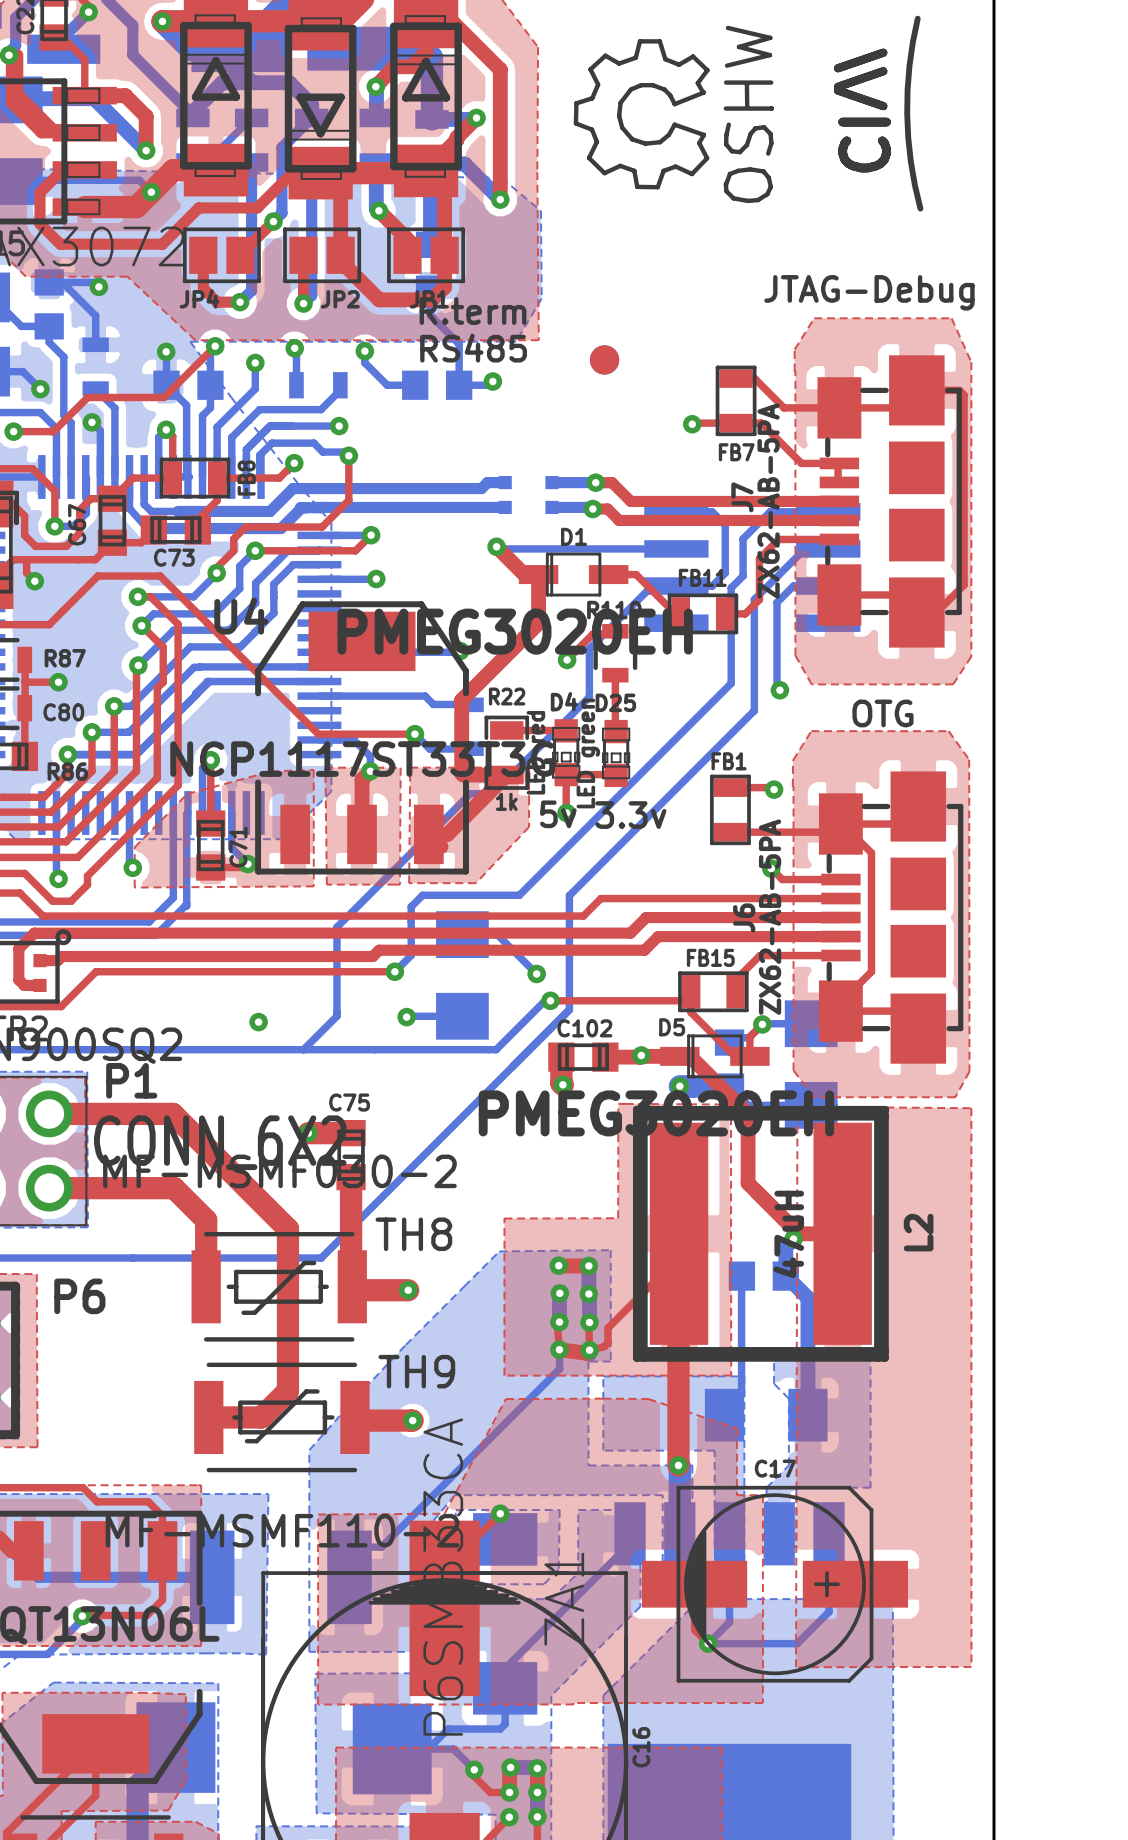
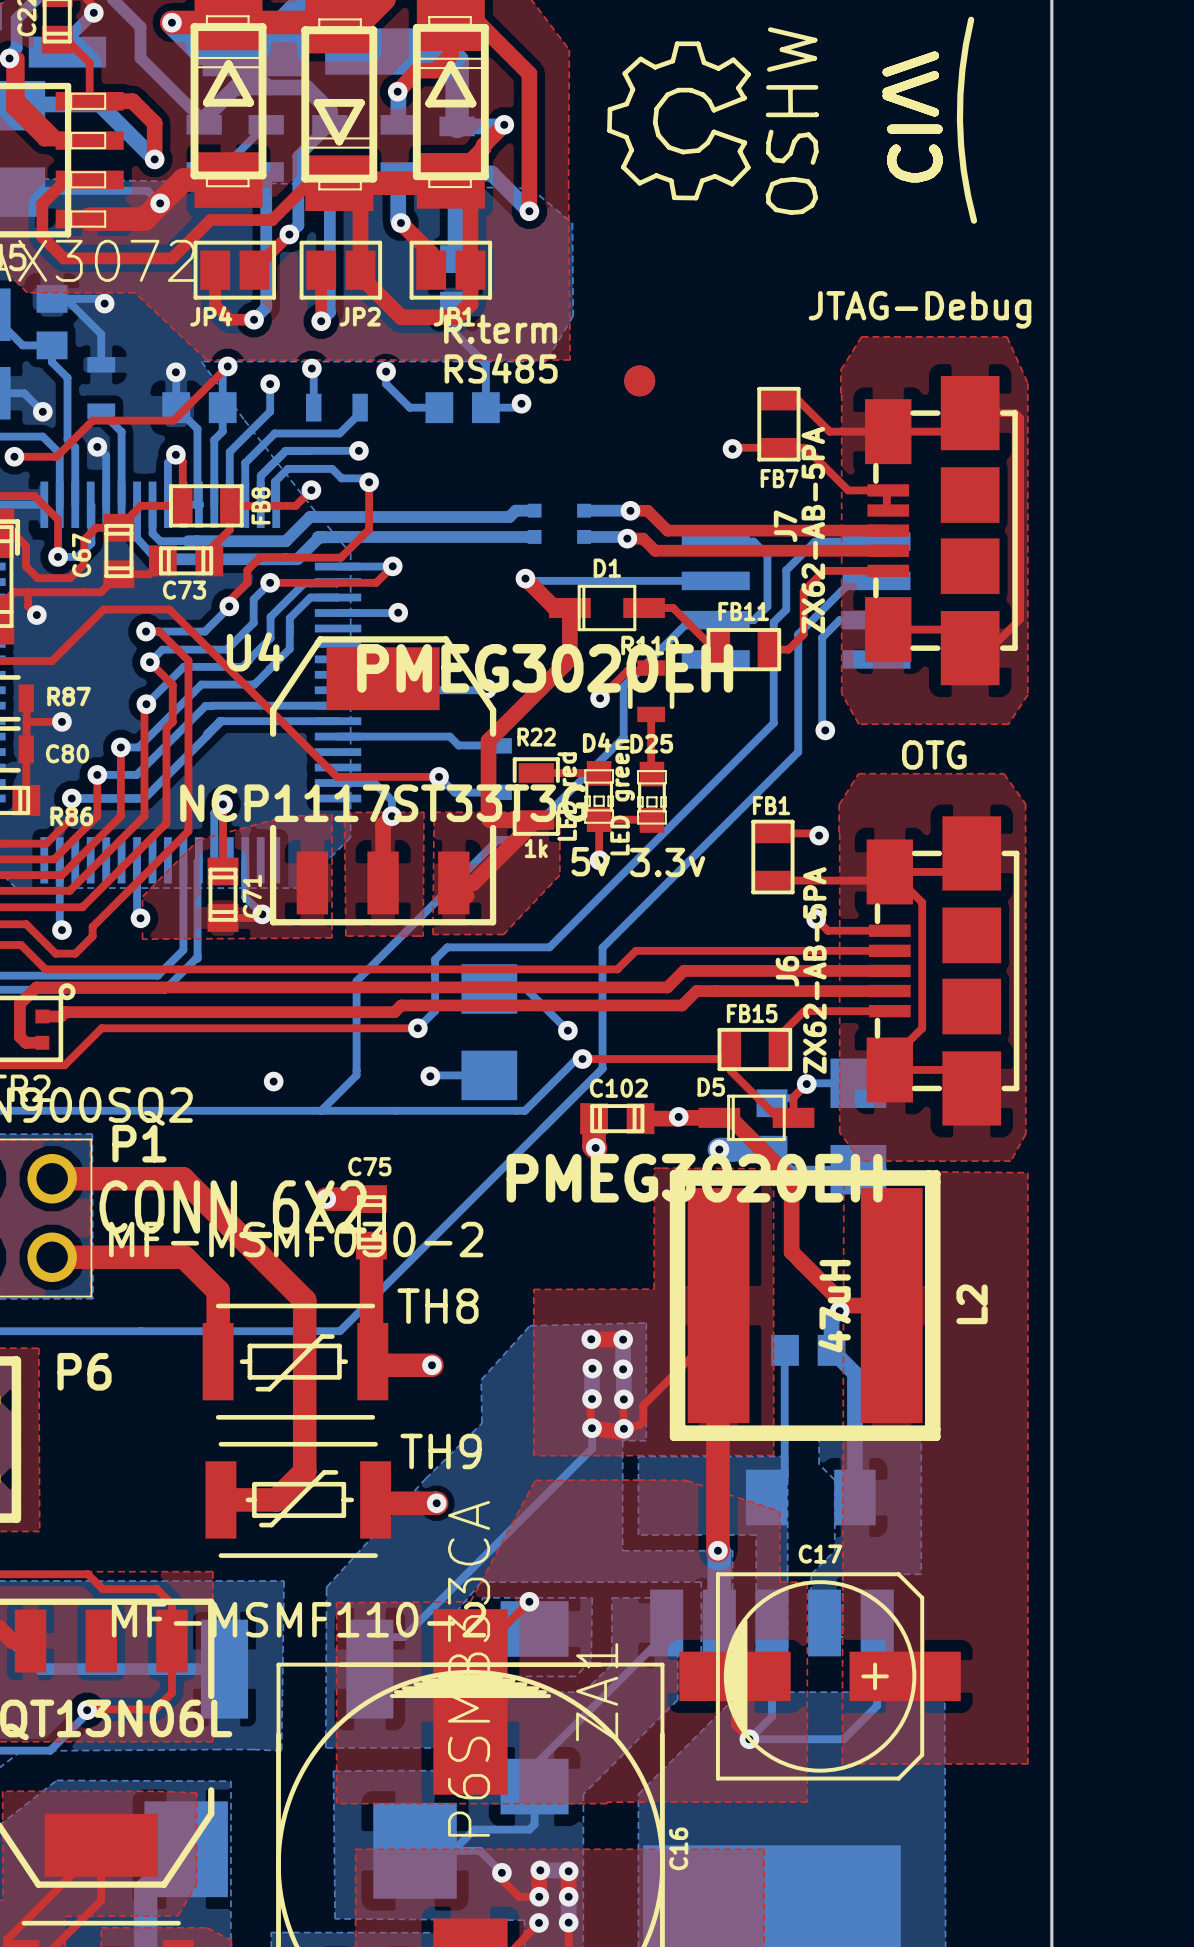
bottom zone outline: (610, 1250) (499, 1251) (405, 1344) (309, 1450) (309, 1651) -> (646, 1322) (529, 1325) (481, 1379) (481, 1423) (425, 1478) (326, 1587) (325, 1747) (327, 1747)

